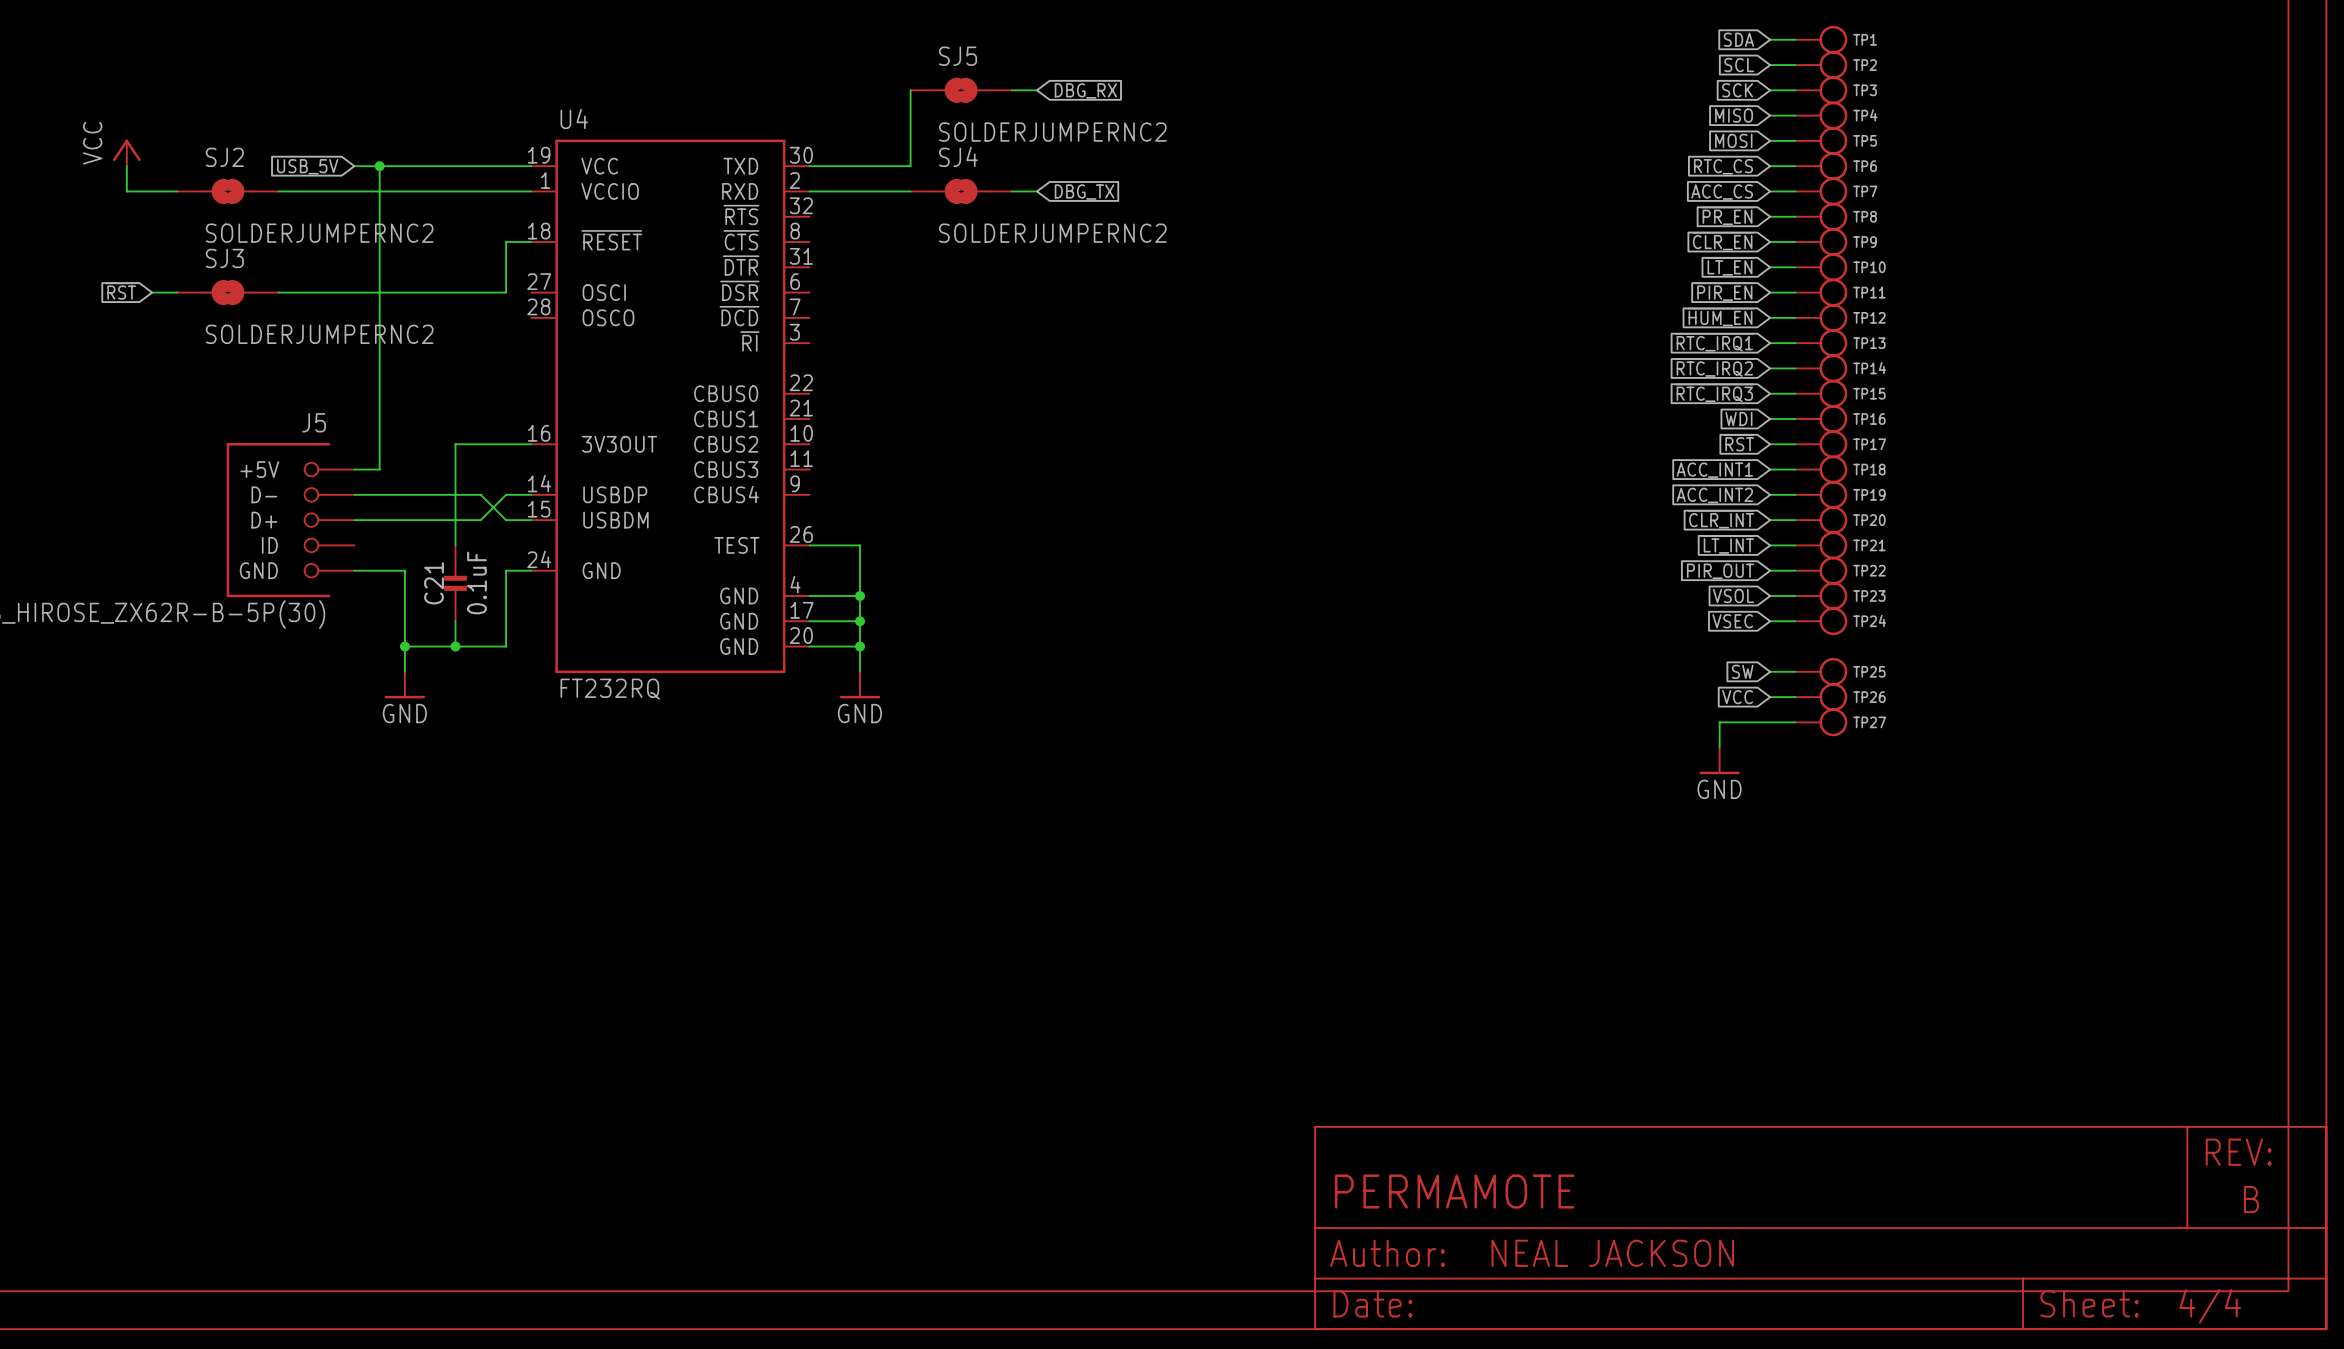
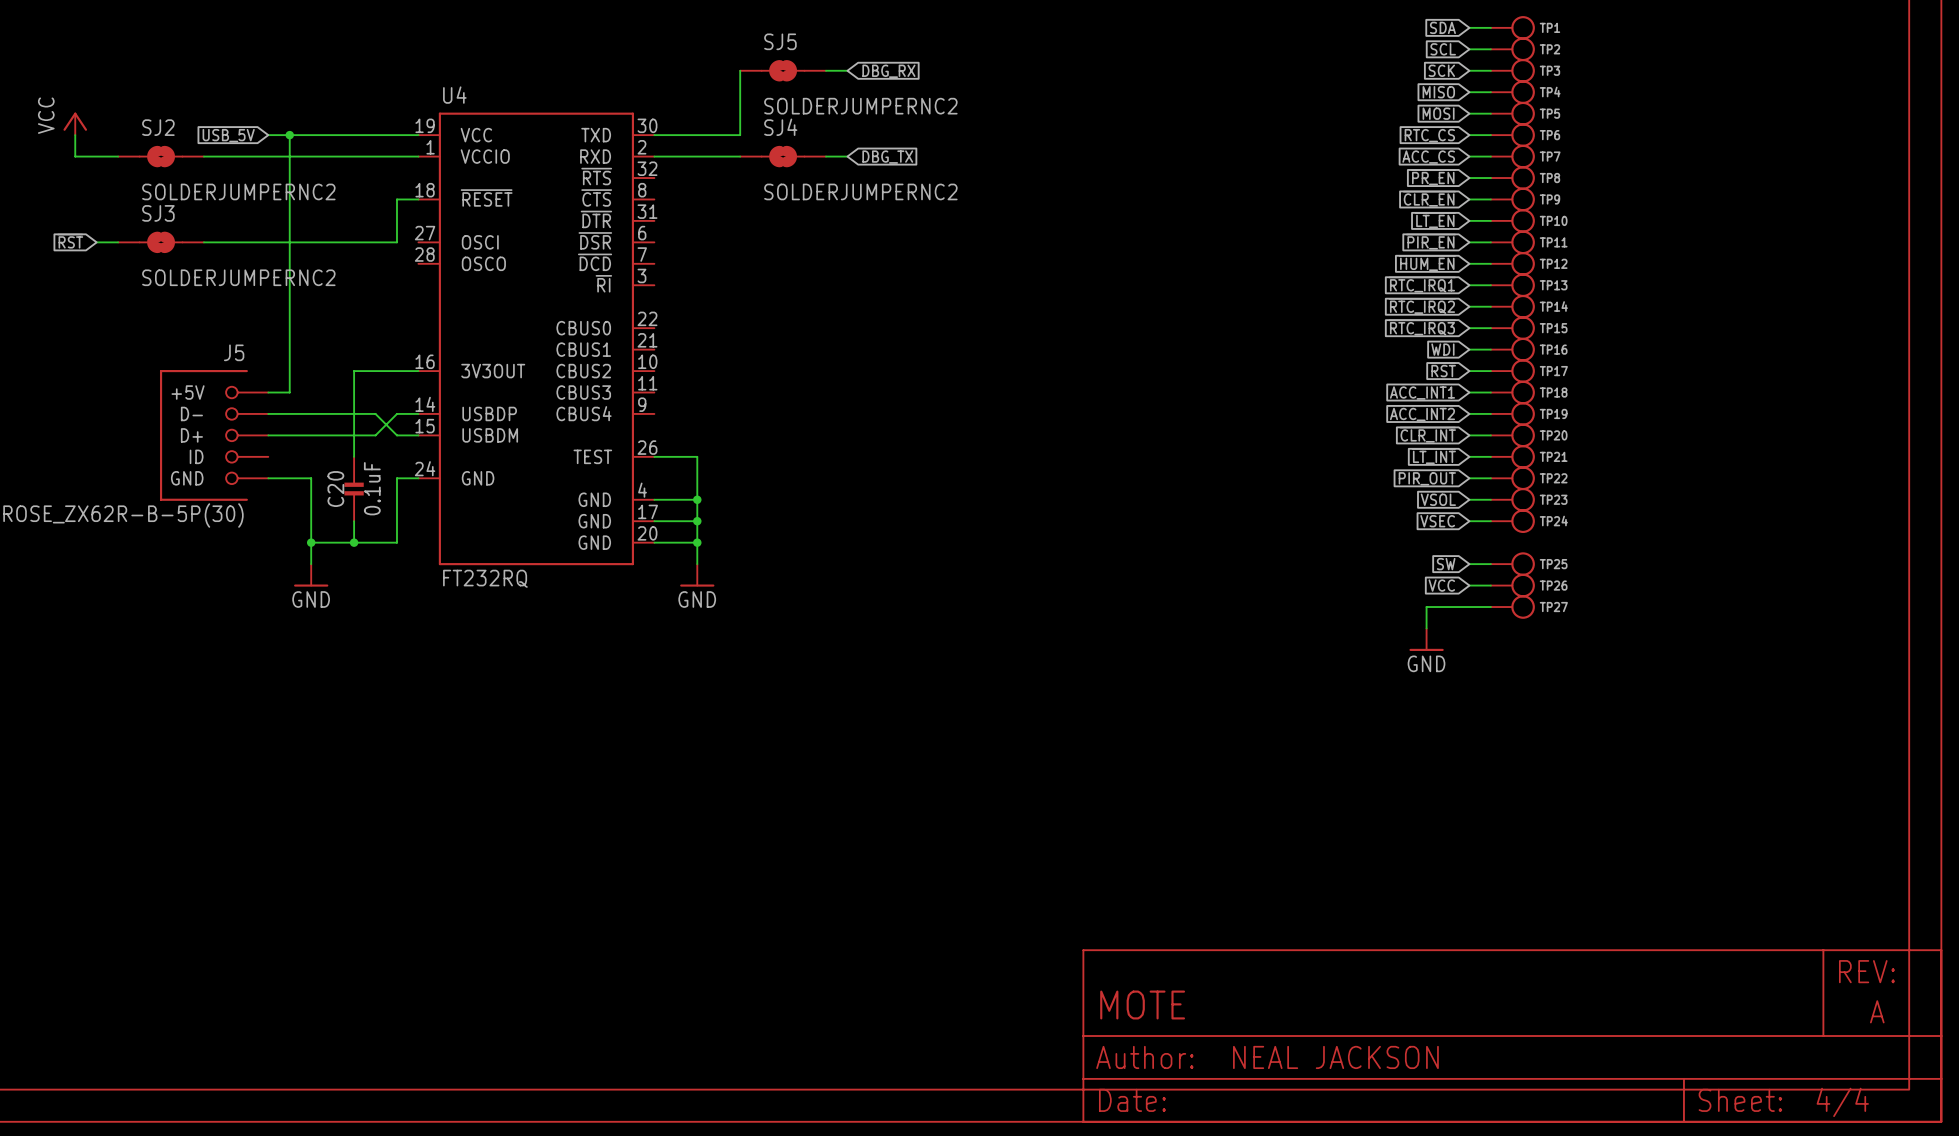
C21 name: C21 (434, 583) -> C20 (335, 489)
part text: PERMAMOTE (1454, 1191) -> MOTE (1142, 1005)
part text: B (2251, 1199) -> A (1877, 1011)

